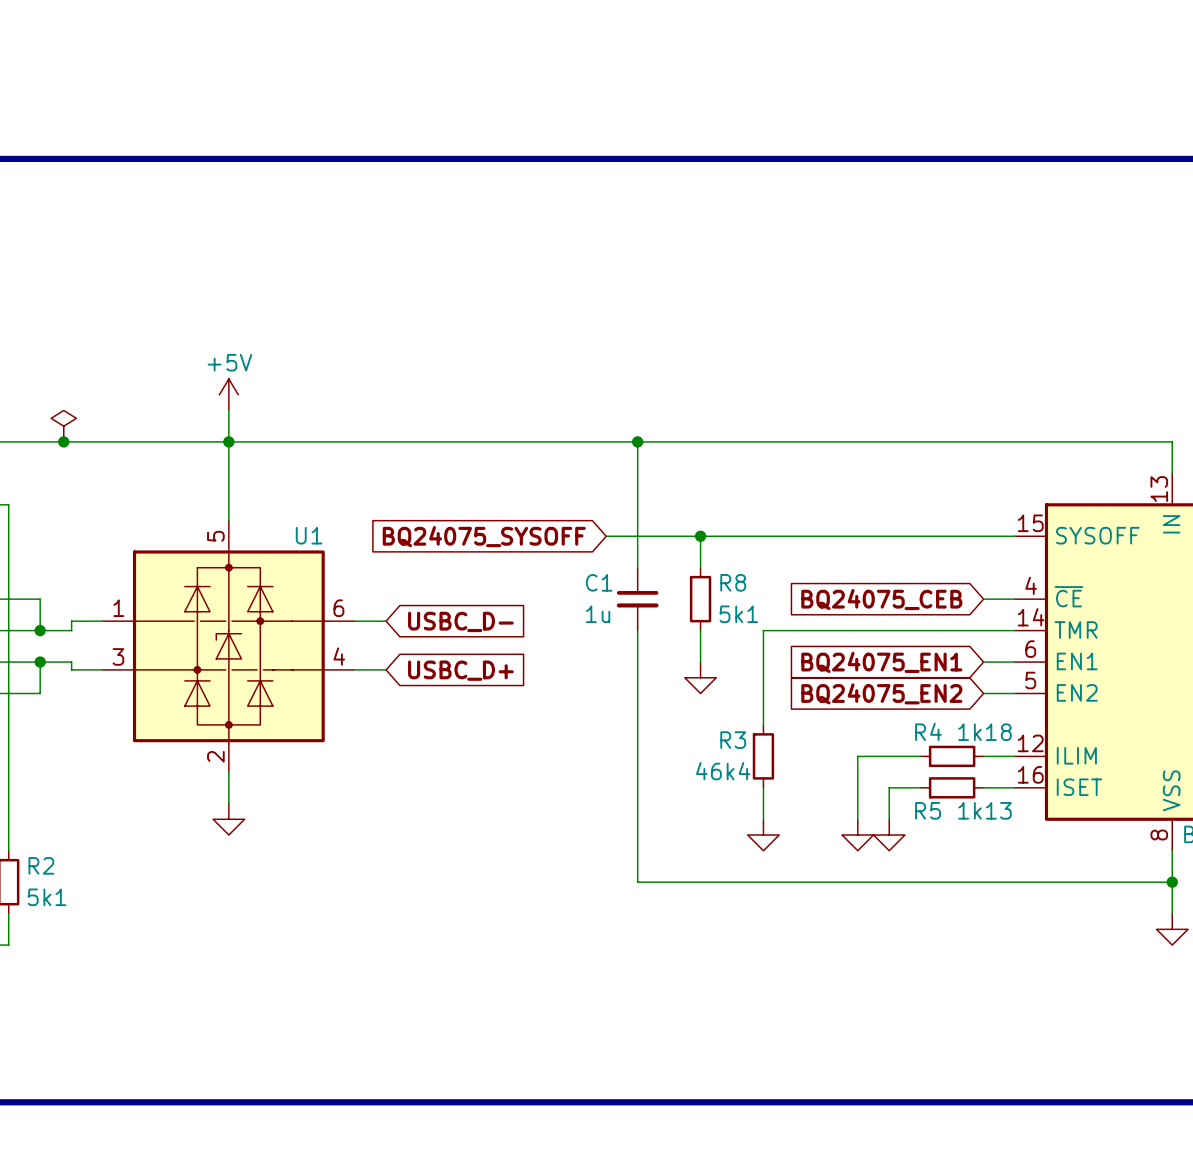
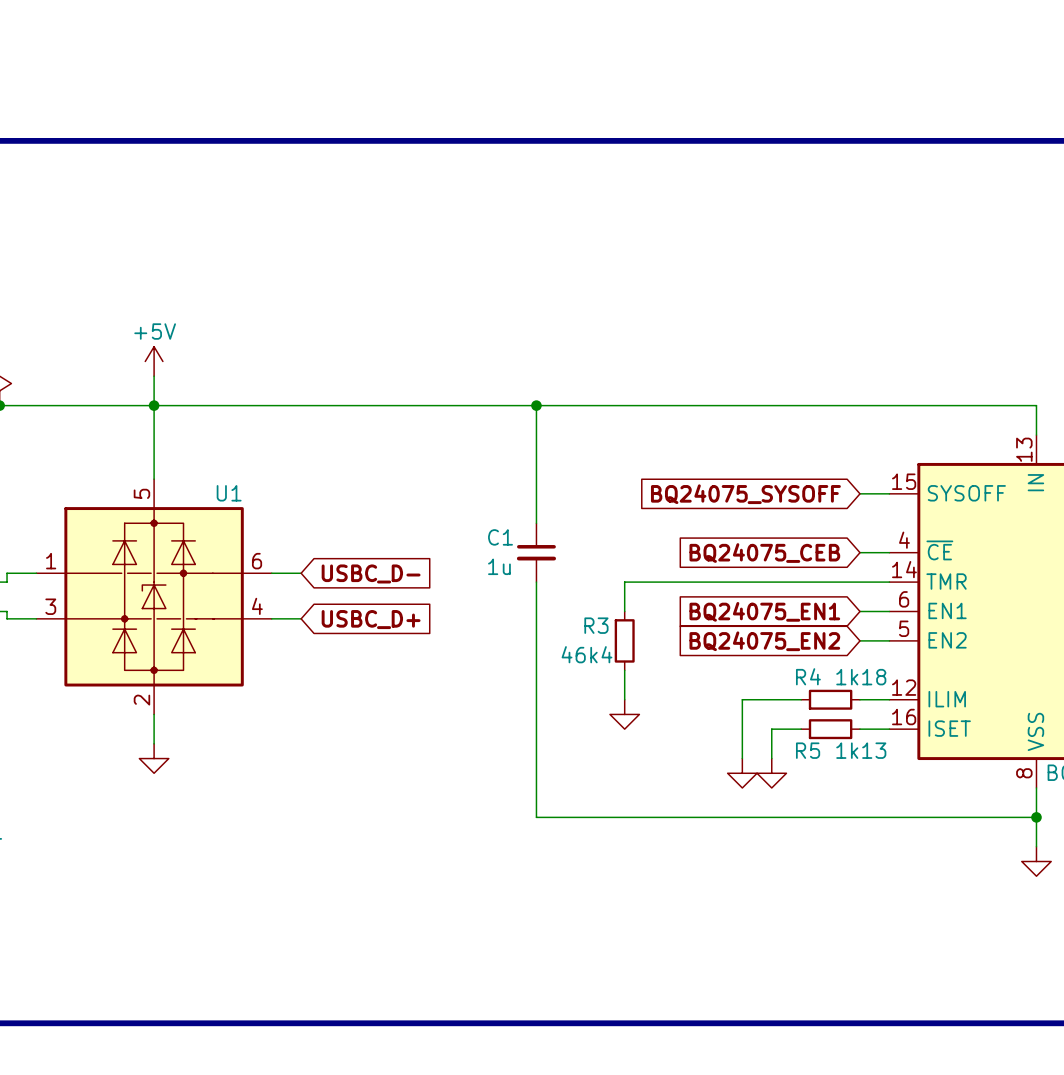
global label: BQ24075_SYSOFF (484, 536) -> none
wire: (606, 536) (983, 536) -> none
wire: (700, 536) (700, 567) -> none
junction: (700, 536) -> none
global label: none -> BQ24075_SYSOFF (745, 494)
R8: 5k1 (700, 599) -> none
wire: (700, 630) (700, 662) -> none
wire: (763, 630) (763, 724) -> (654, 582) (624, 582) (624, 611)
power symbol: (700, 677) -> none
R3 position: (763, 756) -> (624, 640)
power symbol: none -> (624, 714)
wire: (763, 787) (763, 819) -> (624, 670) (624, 699)
power symbol: (763, 835) -> none

